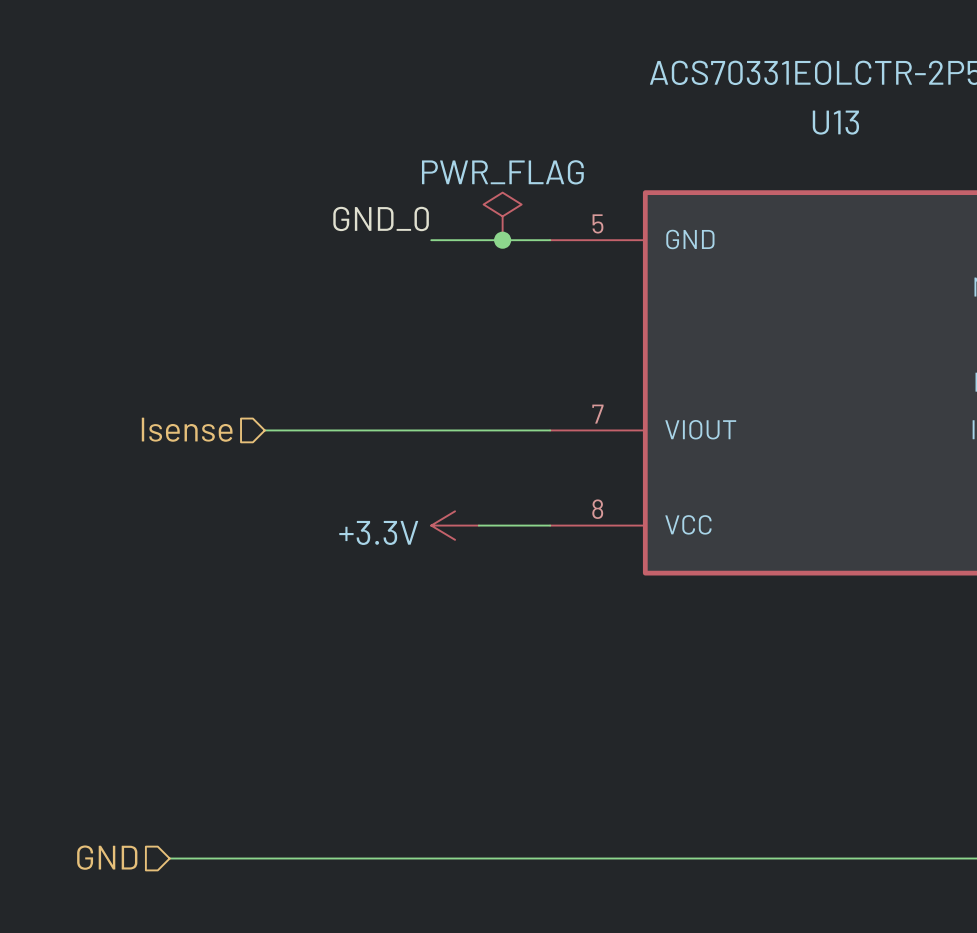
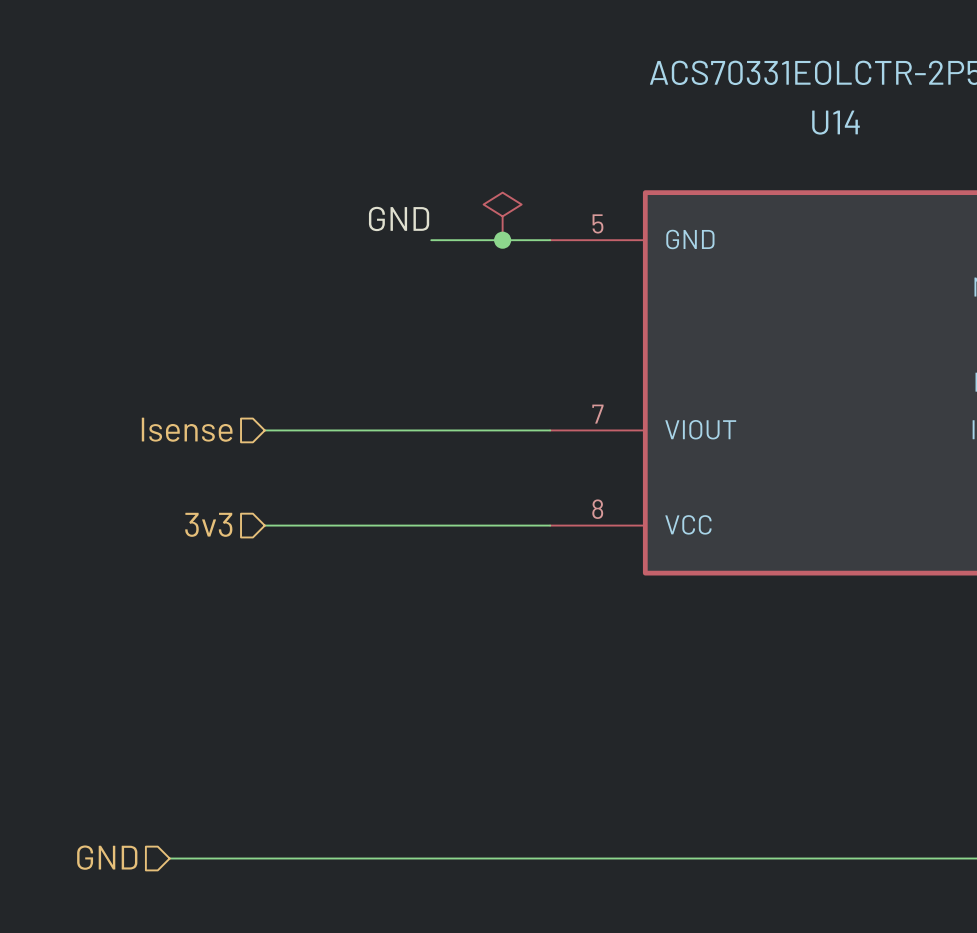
U13 name: U13 (835, 122) -> U14 (835, 122)
power symbol text: PWR_FLAG (502, 172) -> none
label: GND_0 (381, 218) -> GND (399, 218)
hierarchical label: none -> 3v3 (208, 524)
wire: none -> (264, 525) (478, 525)
power symbol: +3.3V (455, 525) -> none

